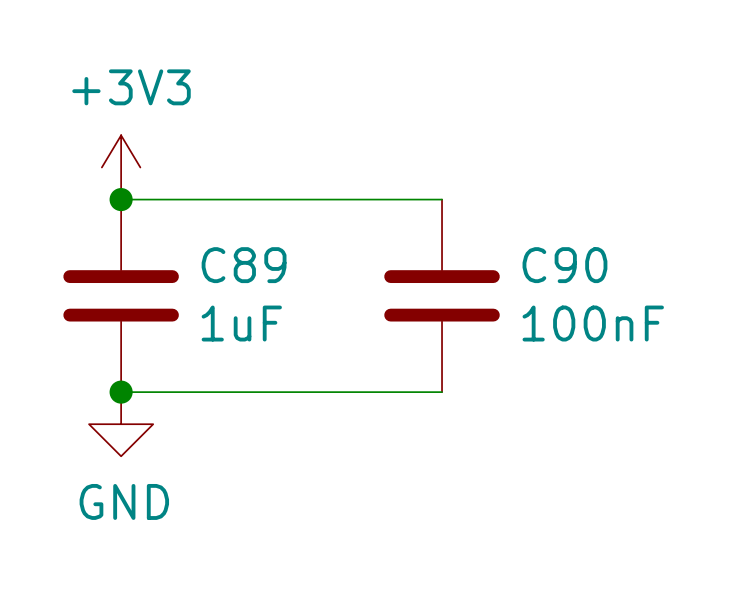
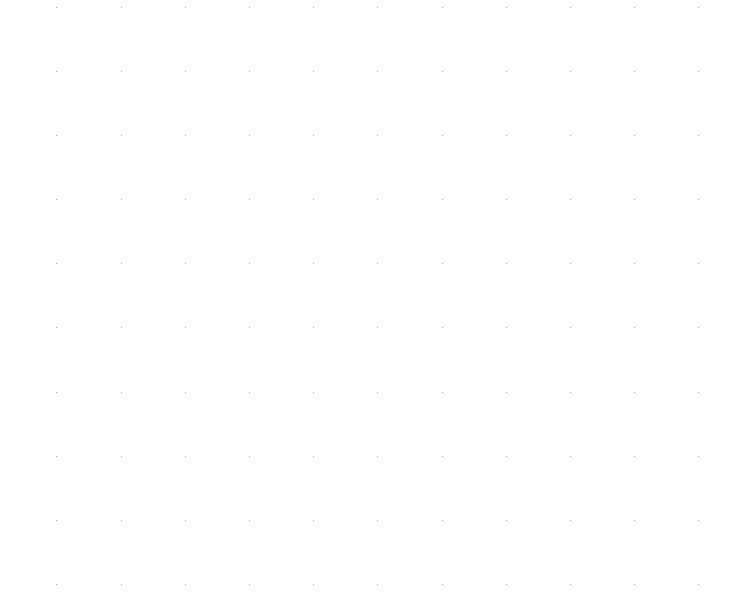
power symbol: +3V3 (121, 167) -> none
wire: (121, 199) (442, 199) -> none
junction: (121, 199) -> none
C89: 1uF (121, 295) -> none
C90: 100nF (442, 295) -> none
wire: (121, 392) (442, 392) -> none
junction: (121, 392) -> none
power symbol: GND (121, 424) -> none

